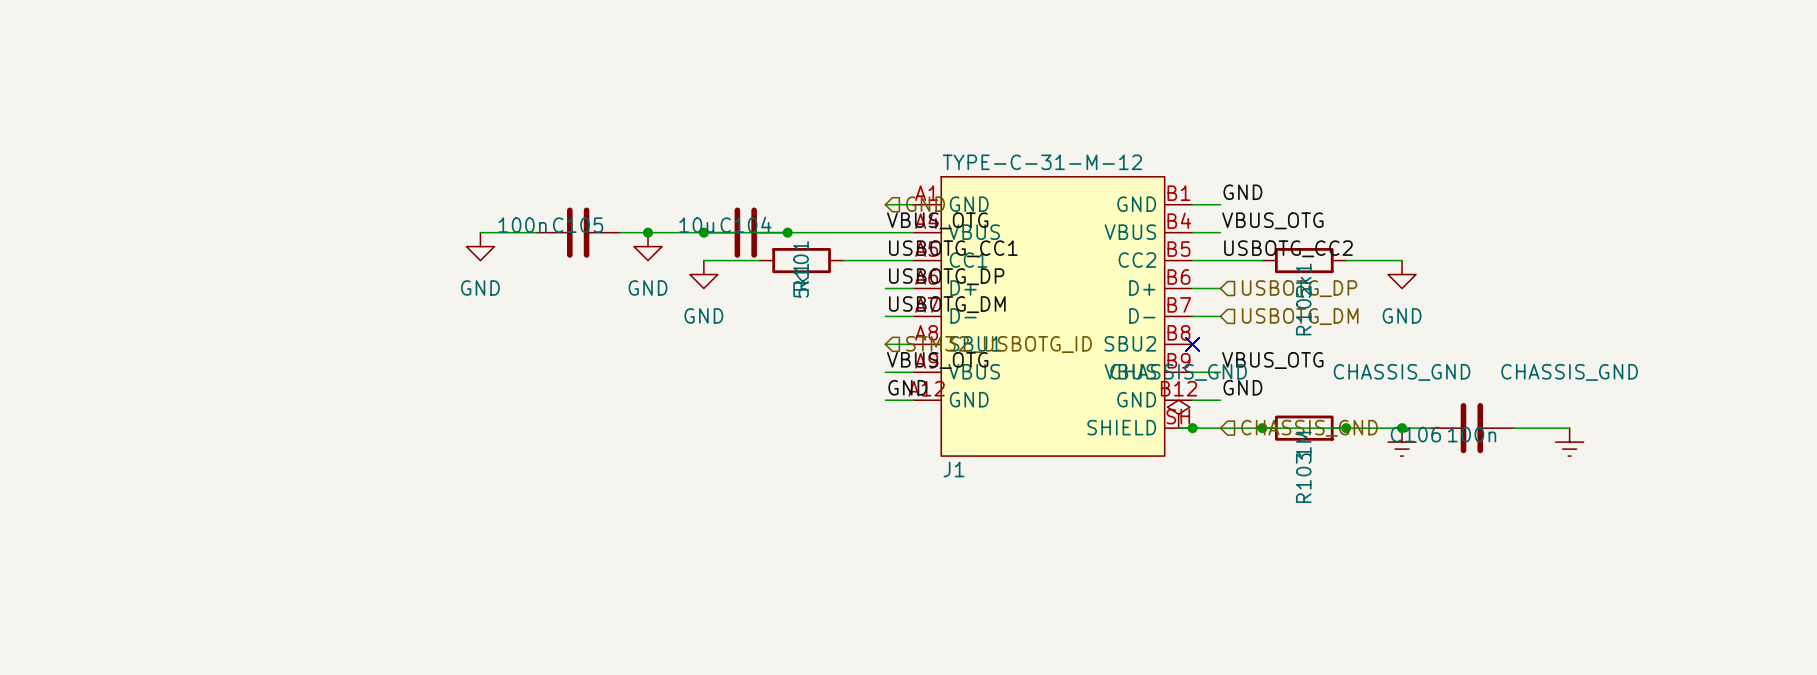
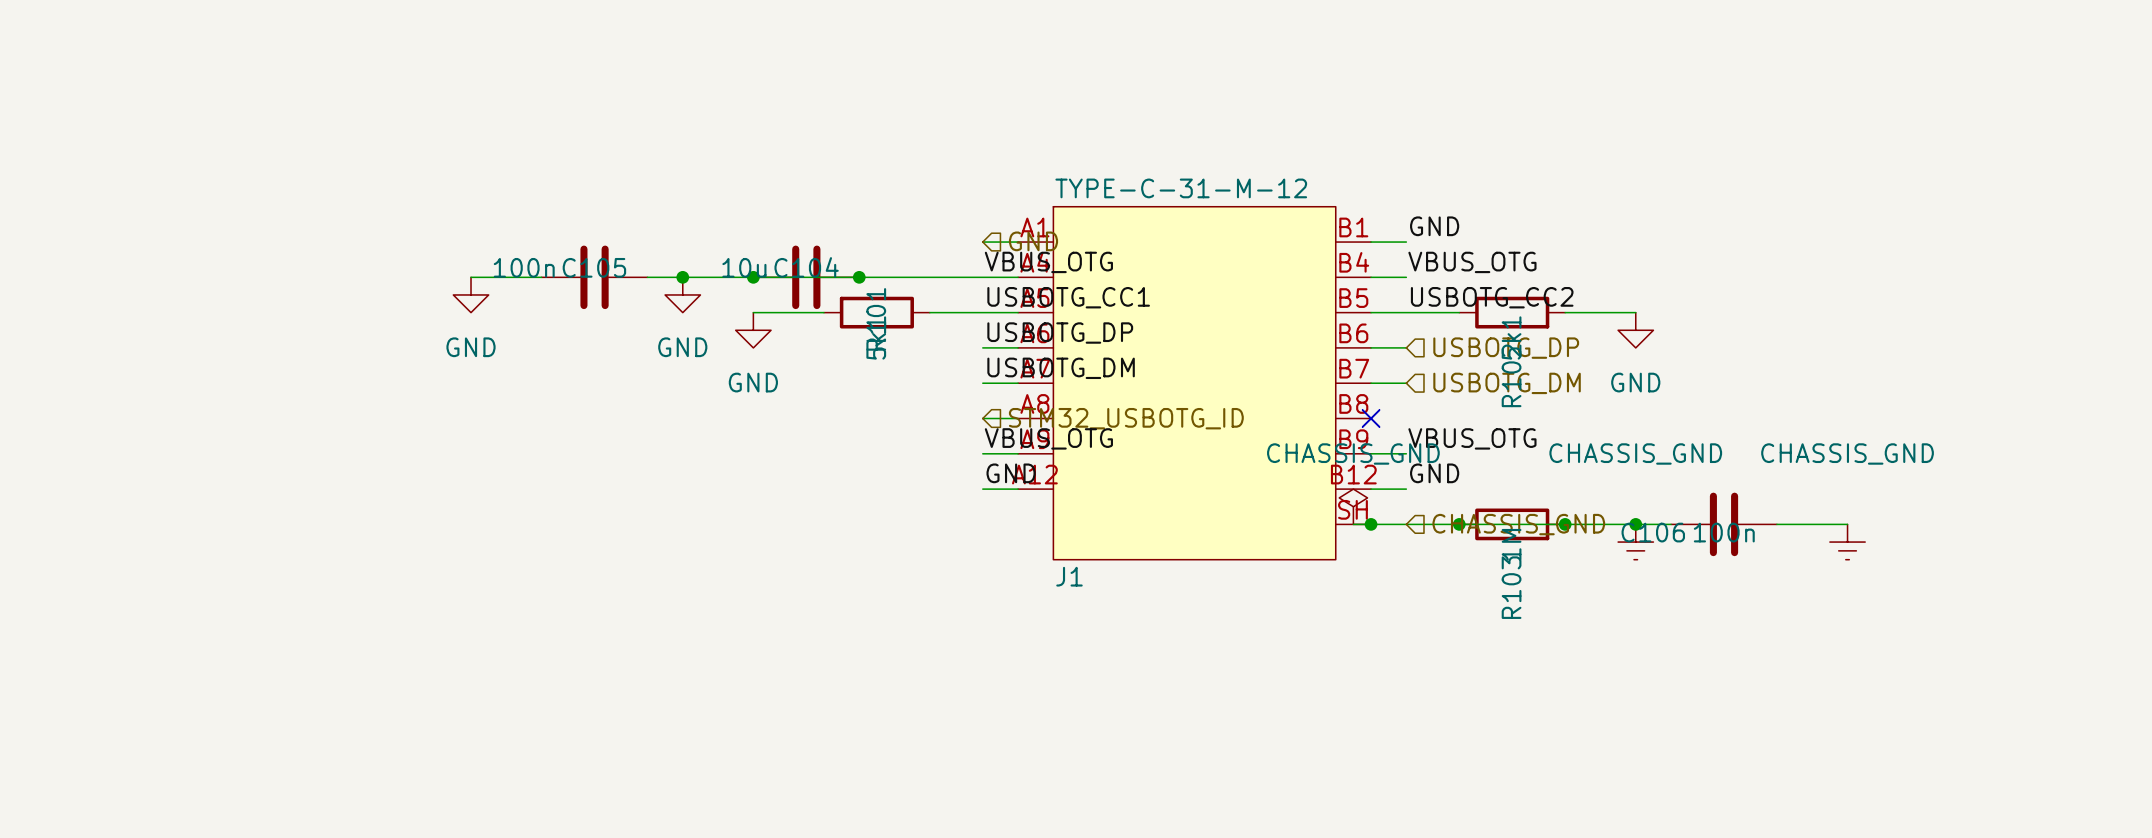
J1 symbol: [913, 176, 1193, 457] -> [1018, 206, 1372, 560]

